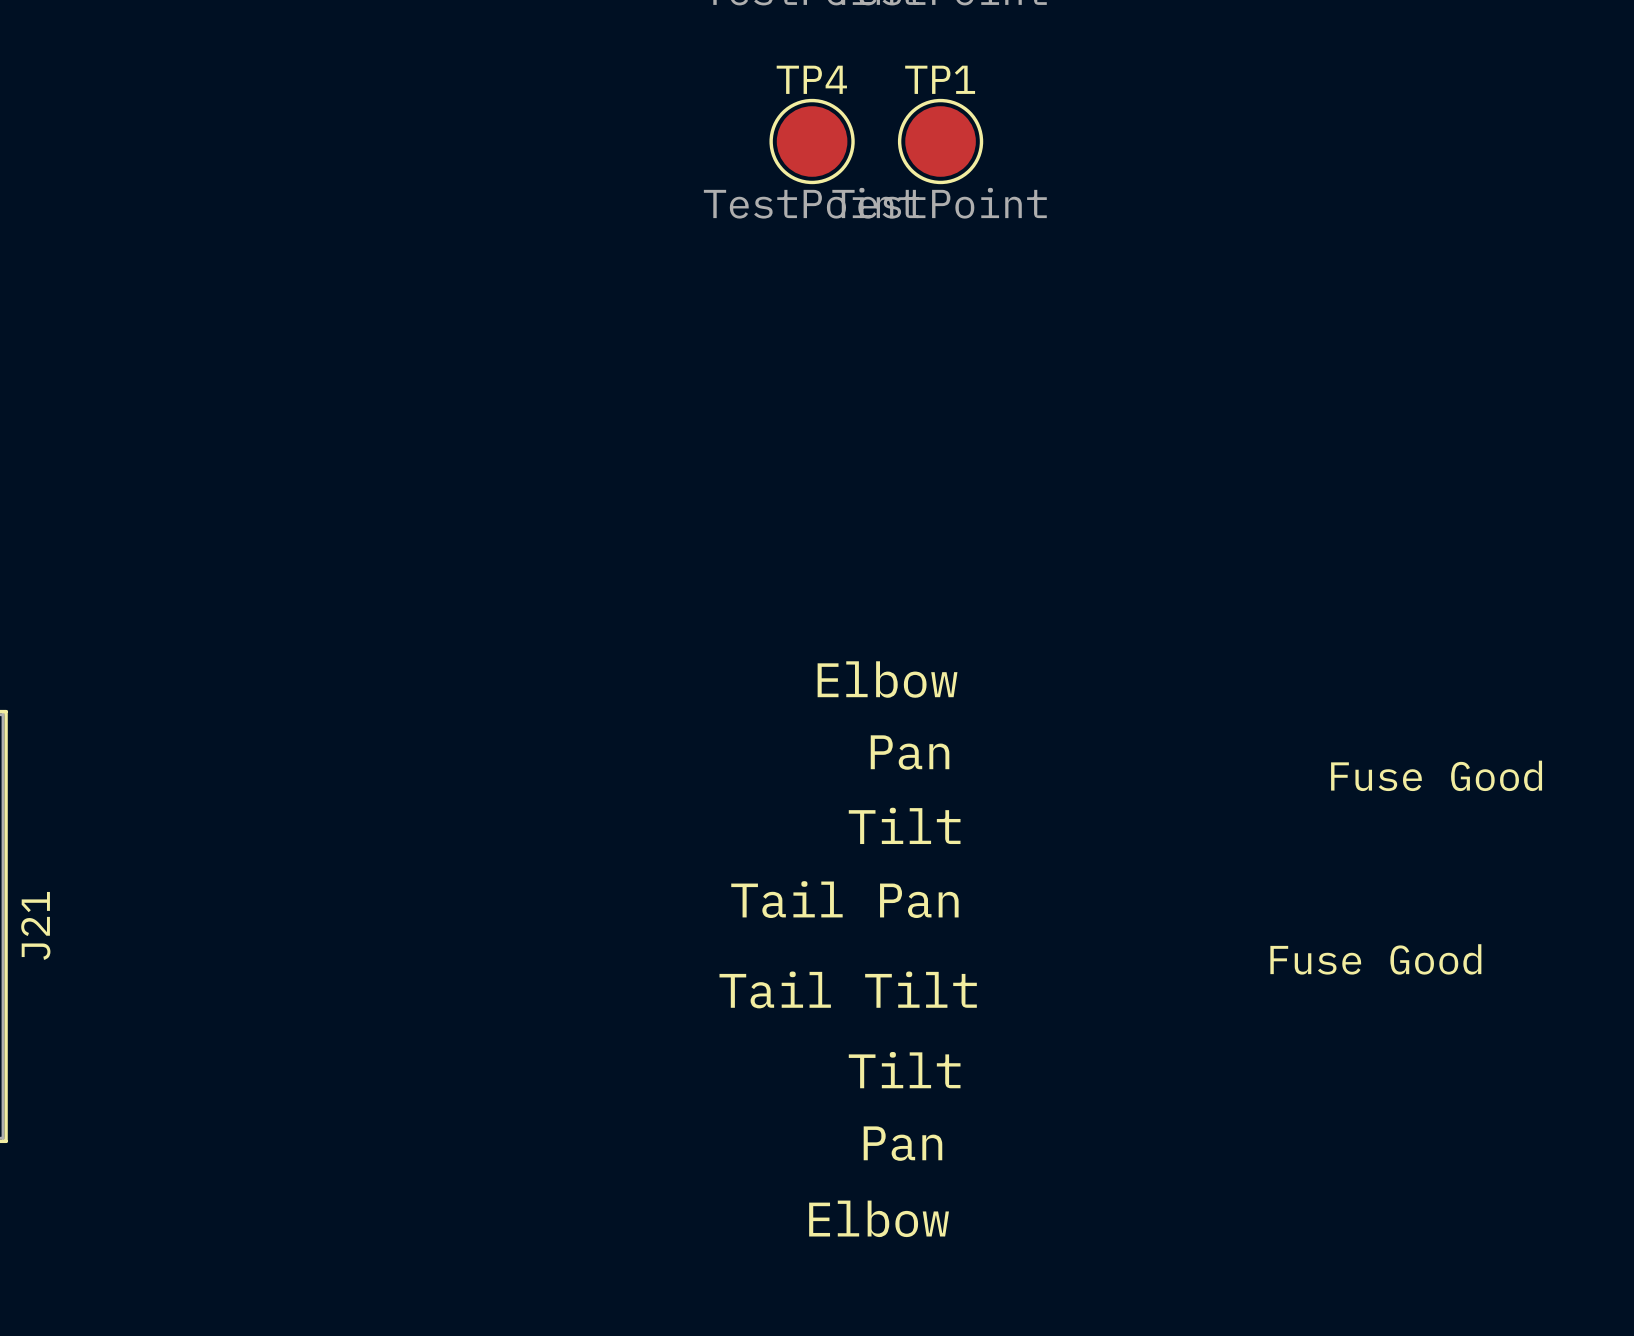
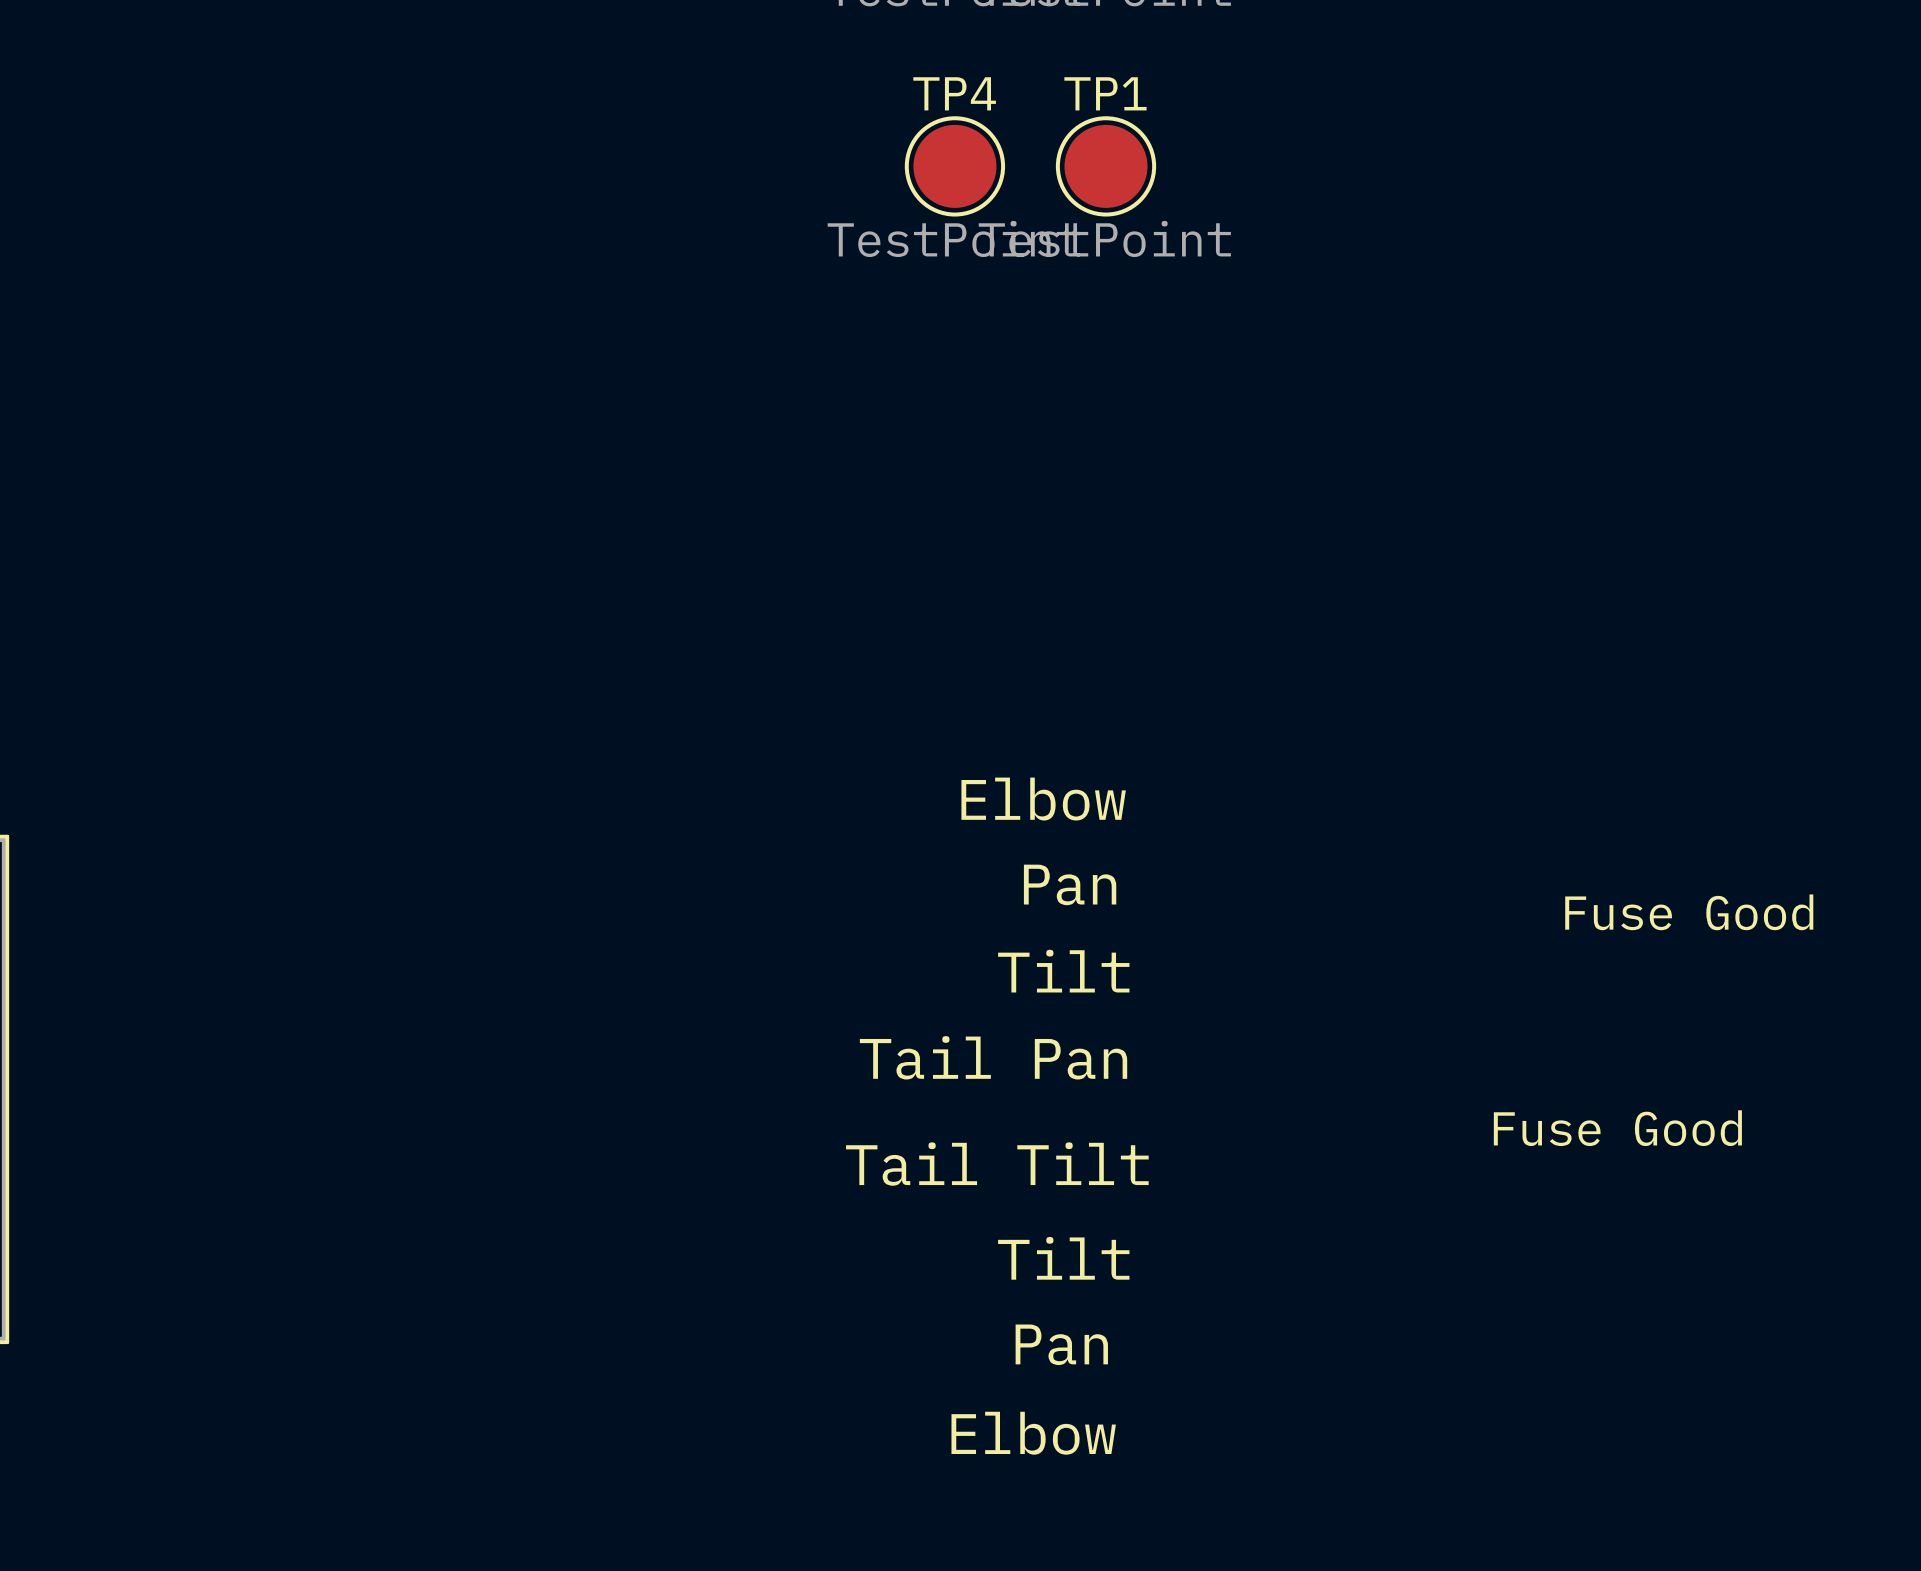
J21 name: J21 (35, 925) -> none

